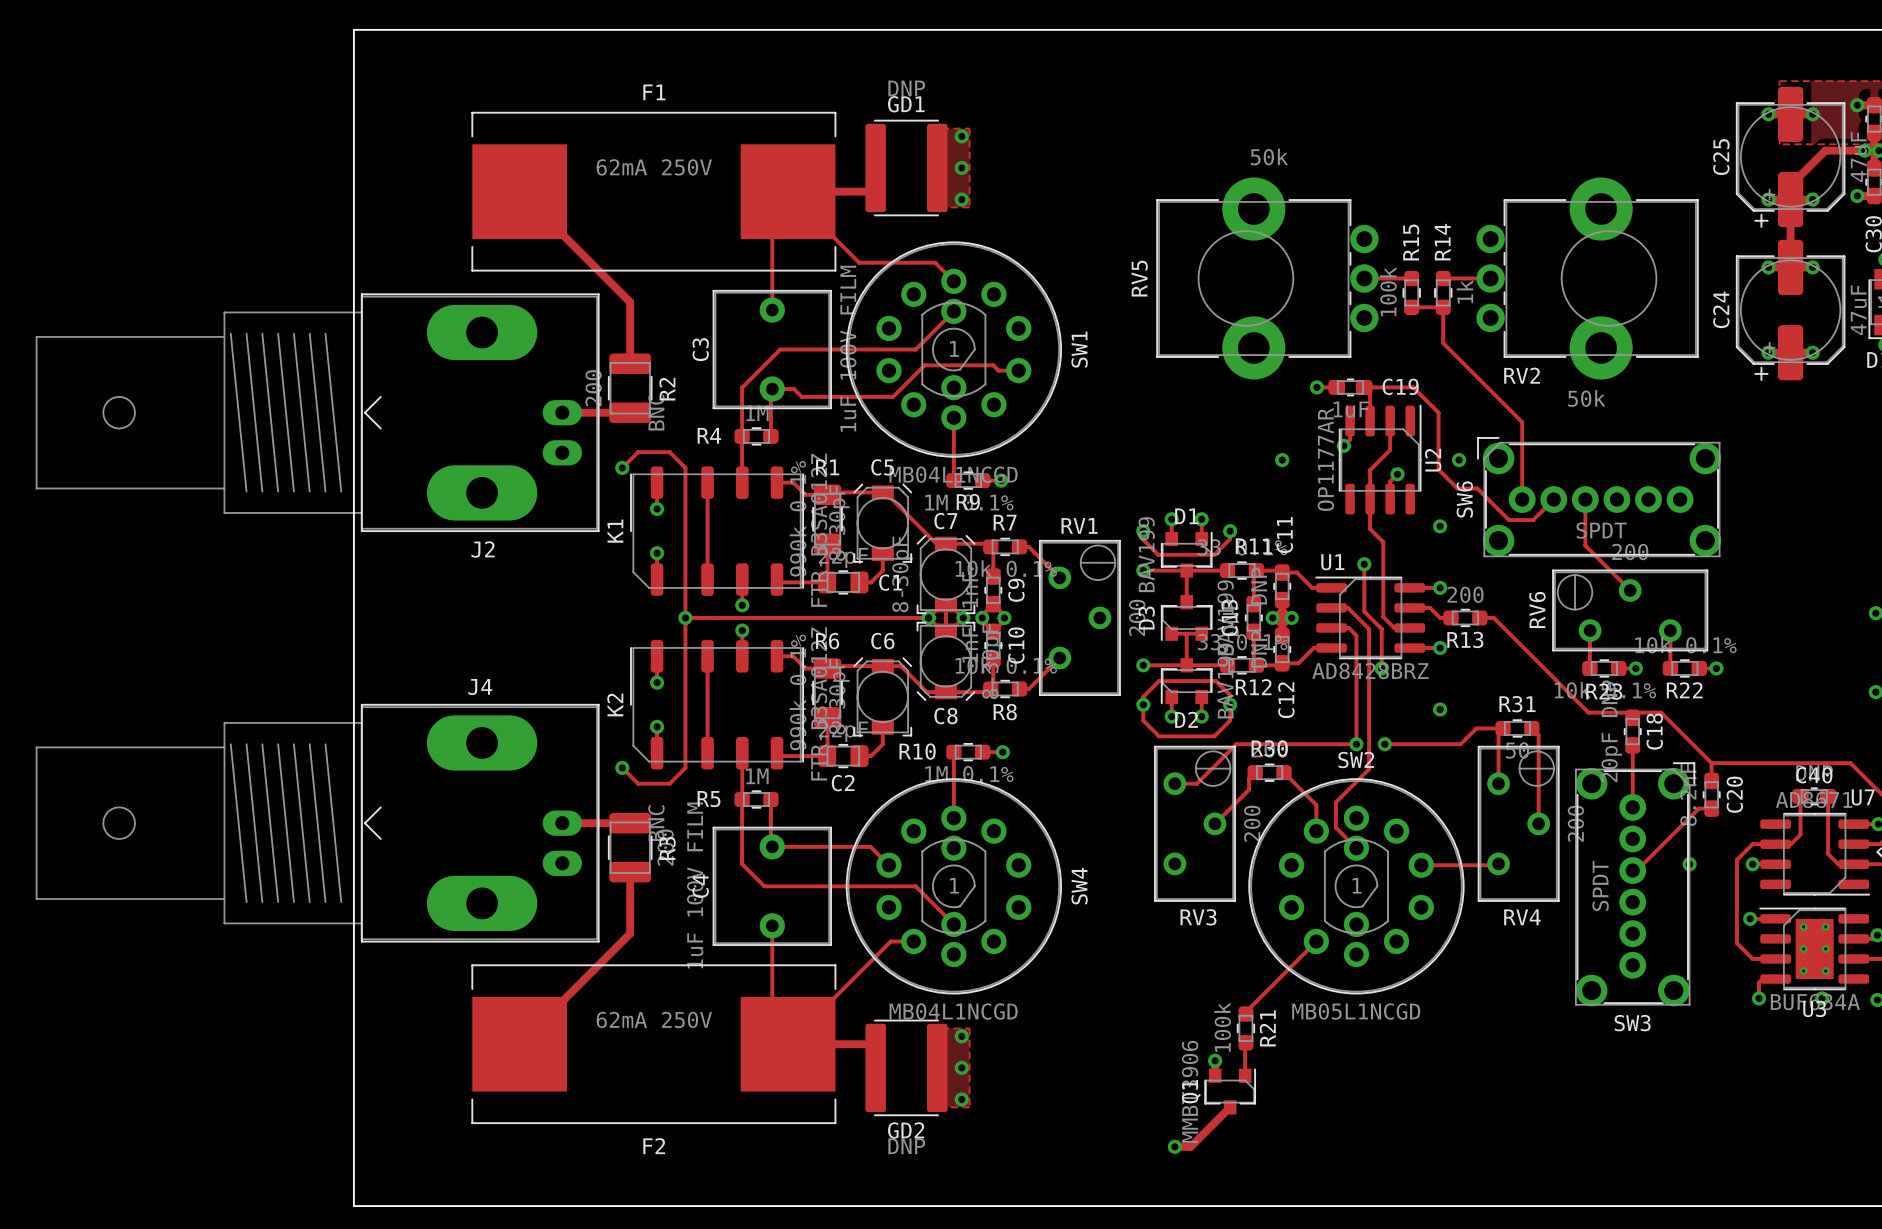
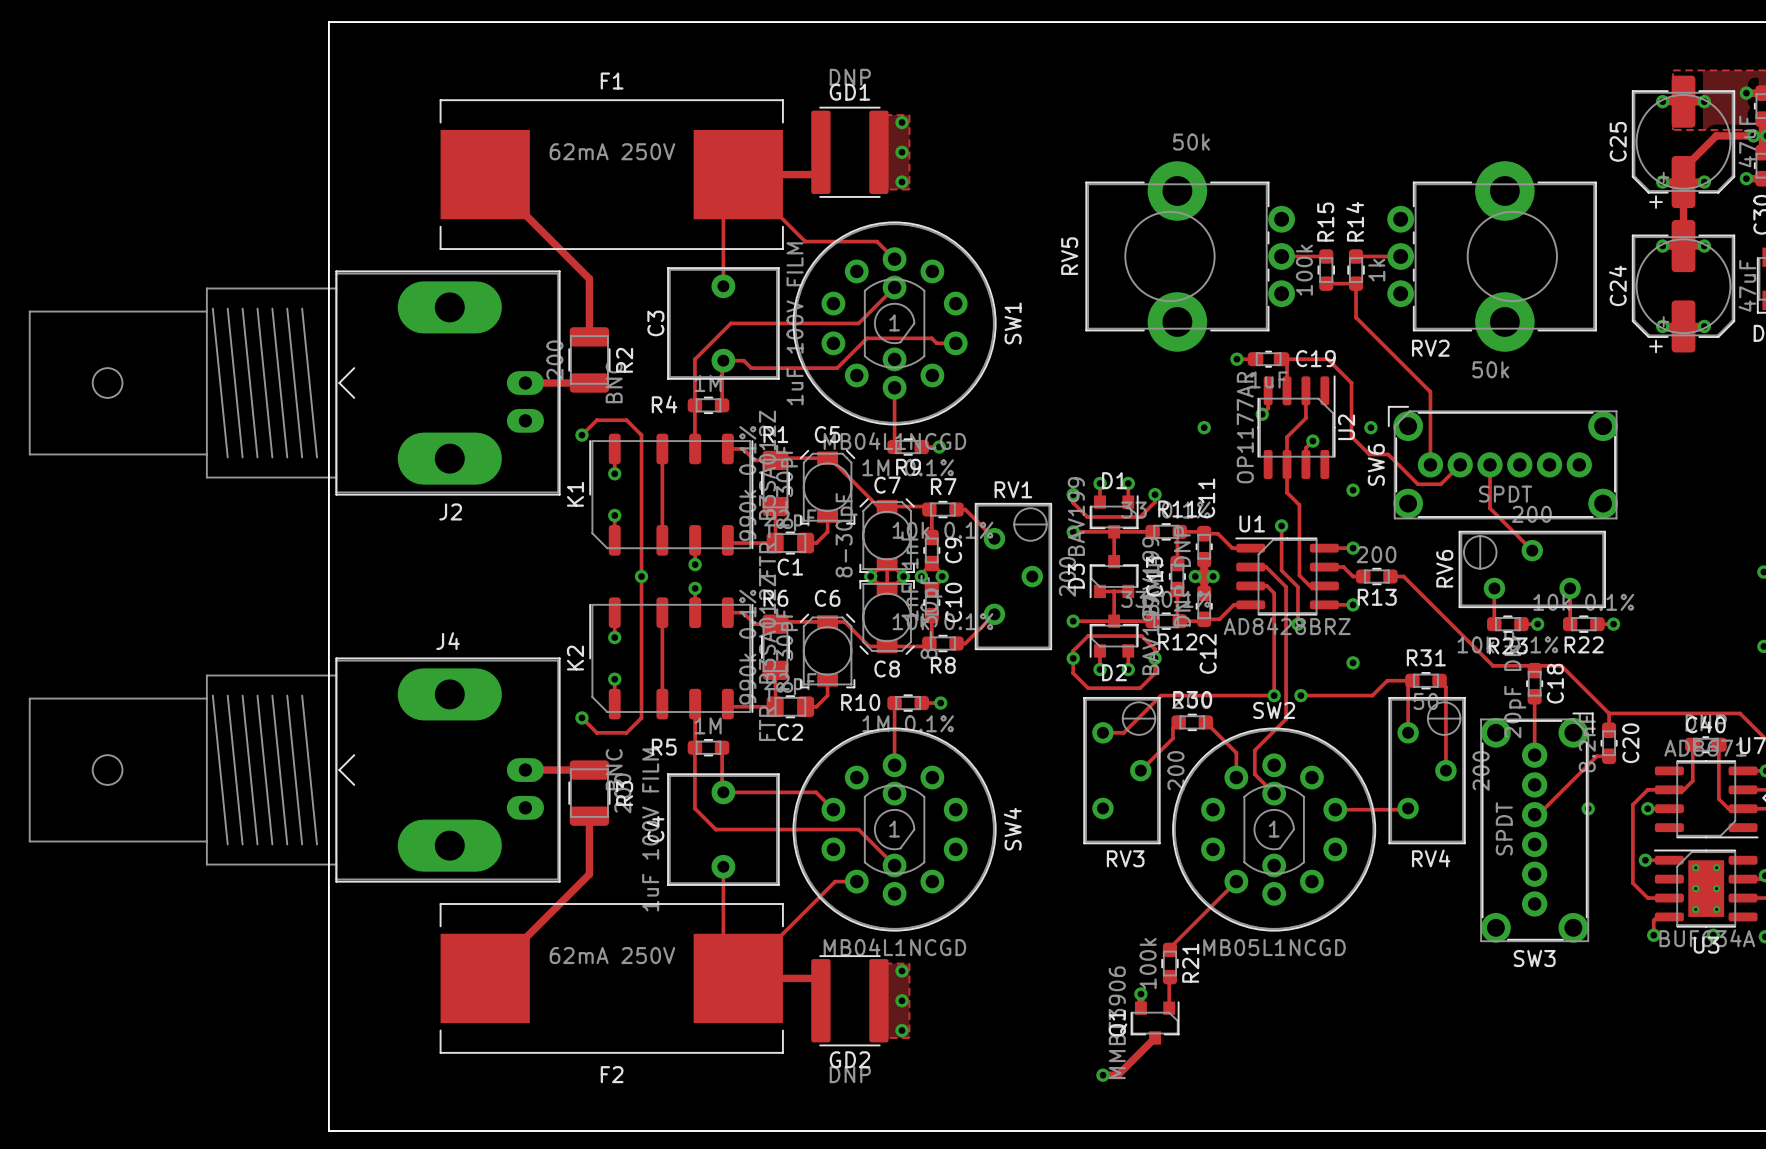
C1 name position: C1 (890, 582) -> C1 (790, 567)
track: (685, 617) (928, 617) -> none

